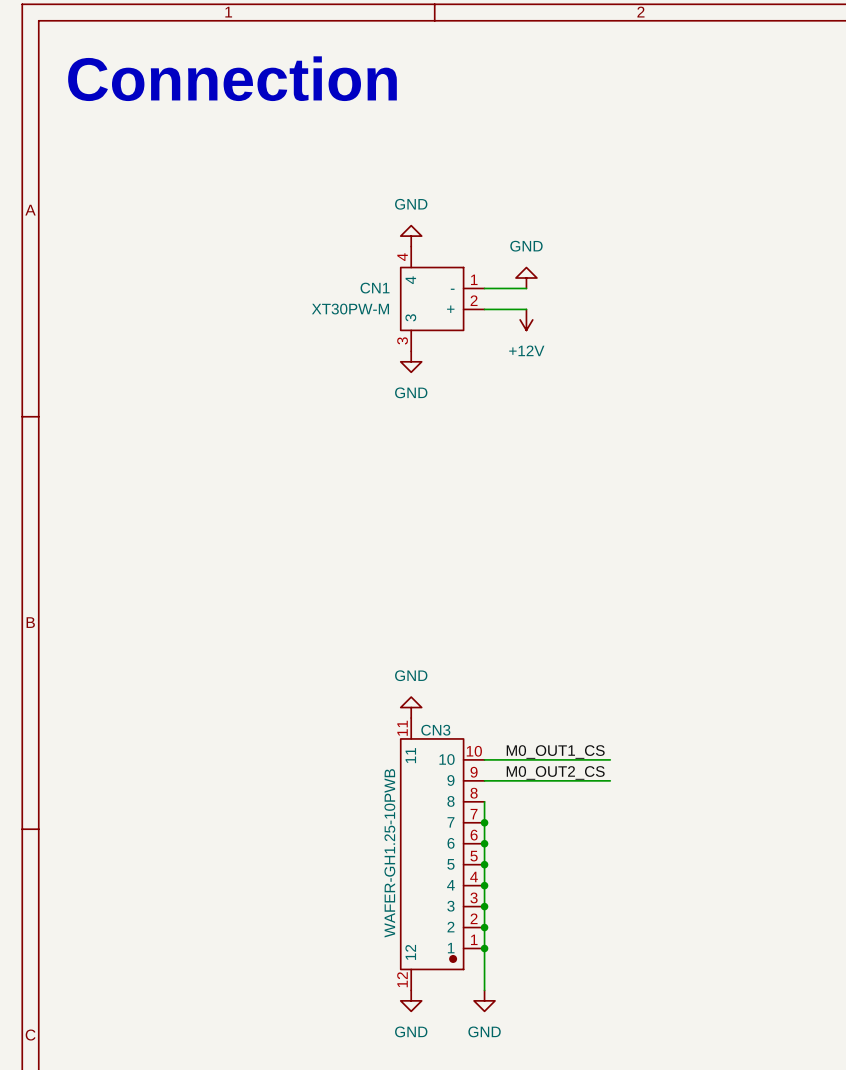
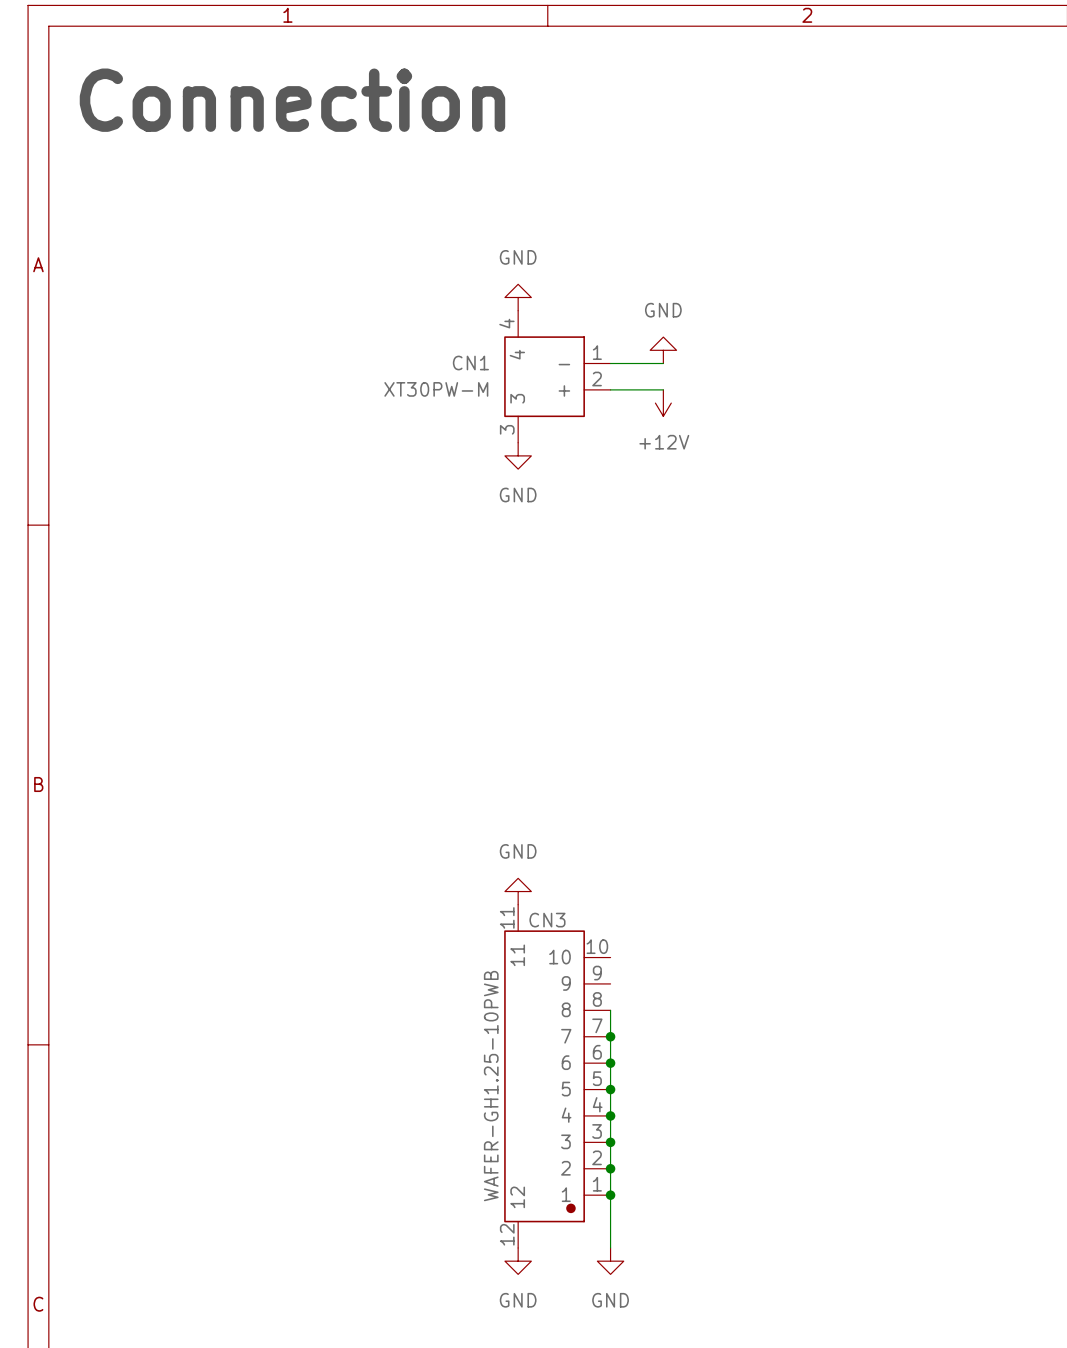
label: M0_OUT1_CS (555, 752) -> none
wire: (484, 759) (610, 759) -> none
label: M0_OUT2_CS (555, 772) -> none
wire: (484, 780) (610, 780) -> none

